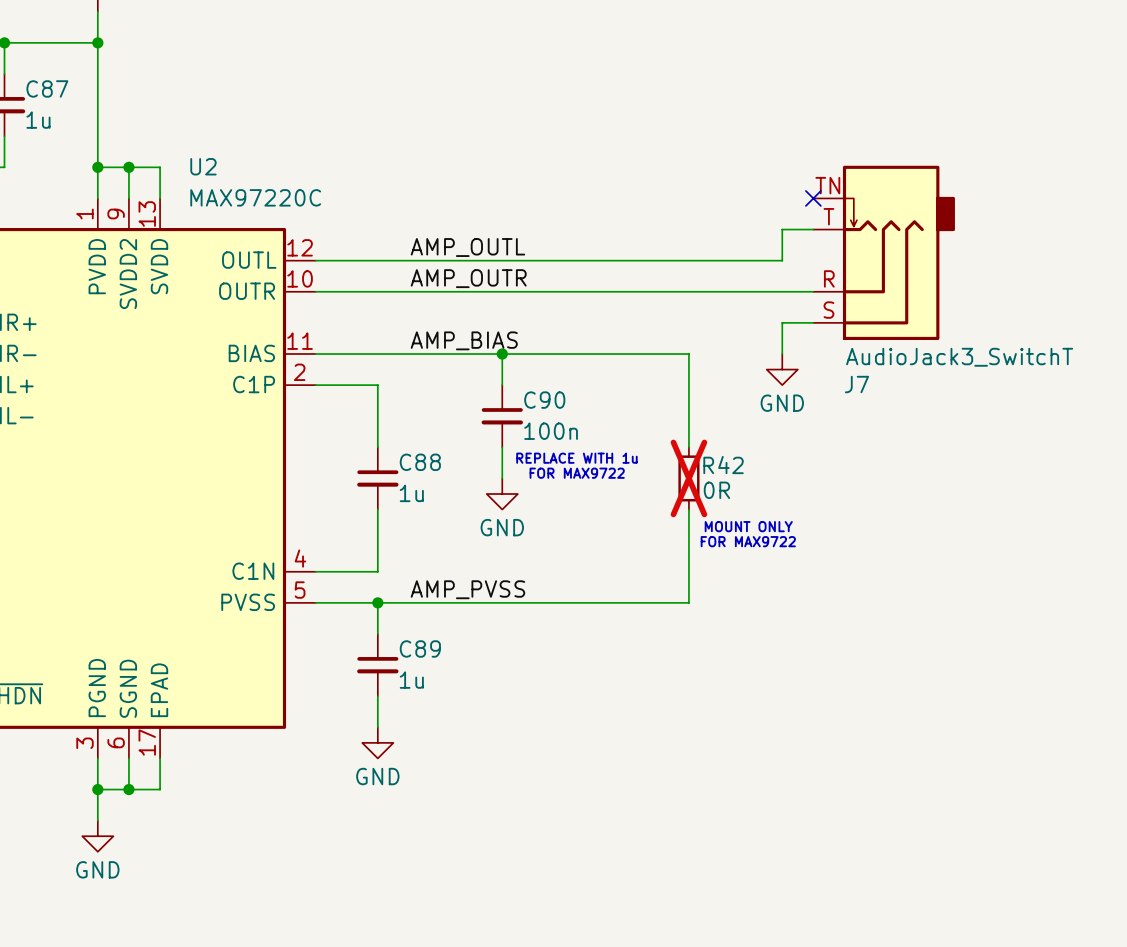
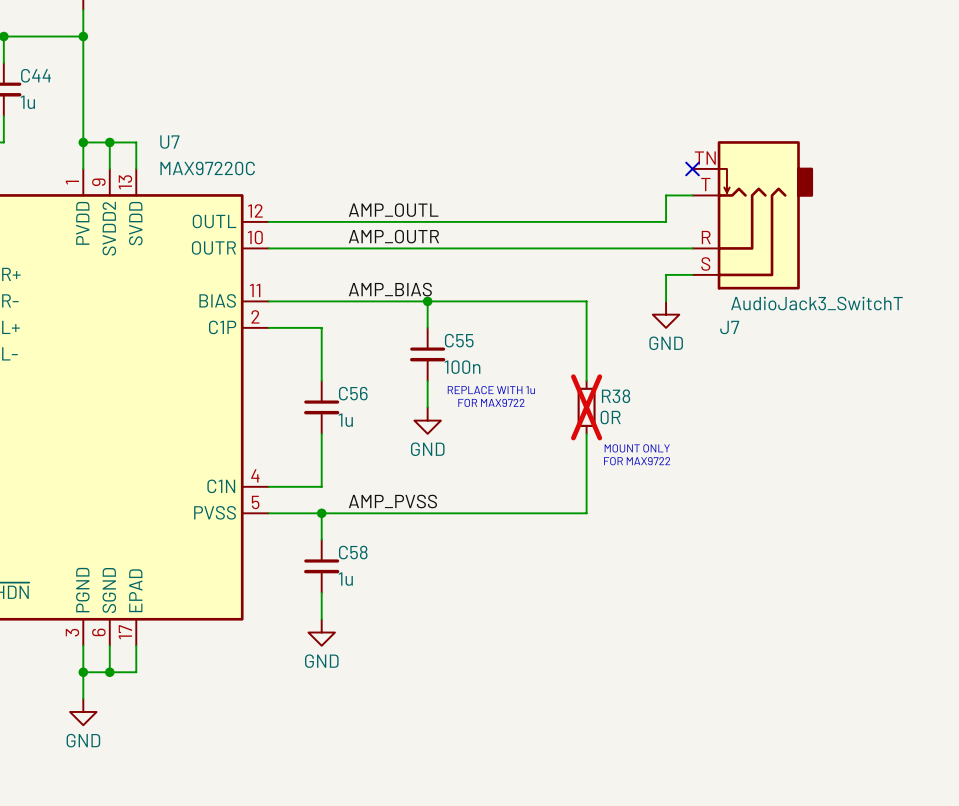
C87 name: C87 (47, 88) -> C44 (36, 75)
U2 name: U2 (203, 166) -> U7 (169, 142)
C90 name: C90 (544, 400) -> C55 (459, 340)
C88 name: C88 (420, 462) -> C56 (353, 393)
R42 name: R42 (723, 465) -> R38 (616, 396)
C89 name: C89 (420, 648) -> C58 (353, 552)

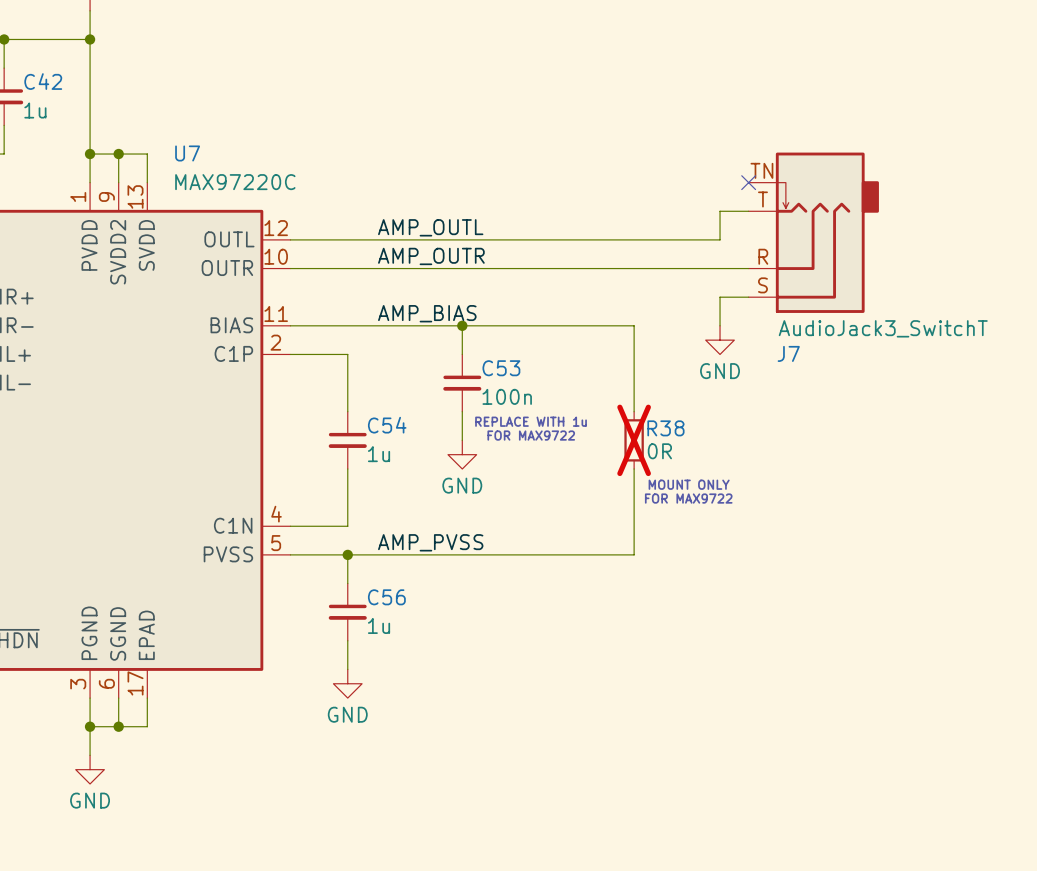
C44 name: C44 (36, 75) -> C42 (43, 81)
C55 name: C55 (459, 340) -> C53 (501, 368)
C56 name: C56 (353, 393) -> C54 (387, 425)
C58 name: C58 (353, 552) -> C56 (386, 597)

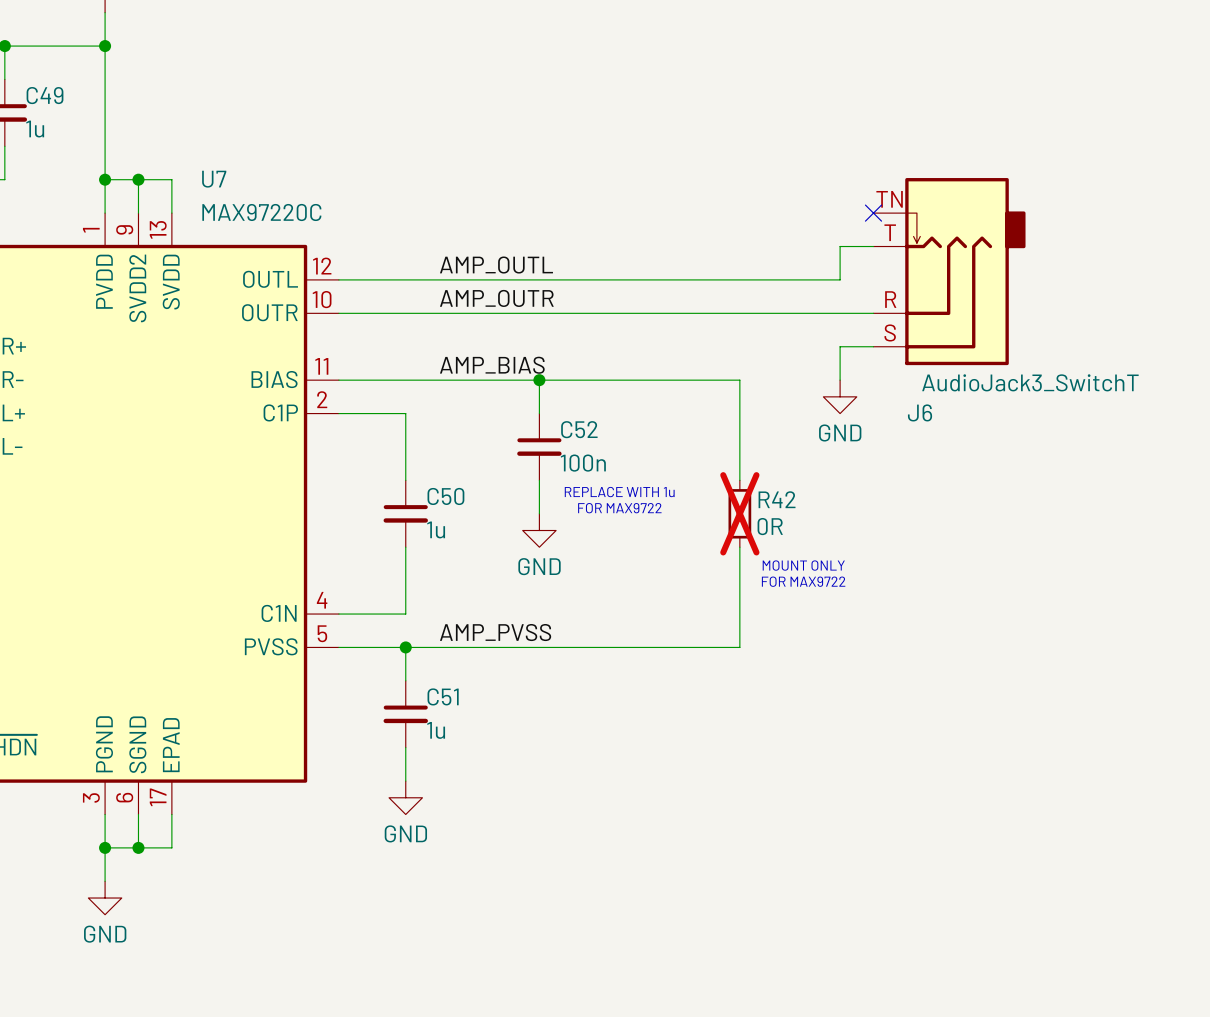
C42 name: C42 (43, 81) -> C49 (45, 95)
J7 name: J7 (788, 353) -> J6 (920, 412)
C53 name: C53 (501, 368) -> C52 (579, 429)
C54 name: C54 (387, 425) -> C50 (445, 496)
R38 name: R38 (665, 428) -> R42 (777, 499)
C56 name: C56 (386, 597) -> C51 (443, 696)

